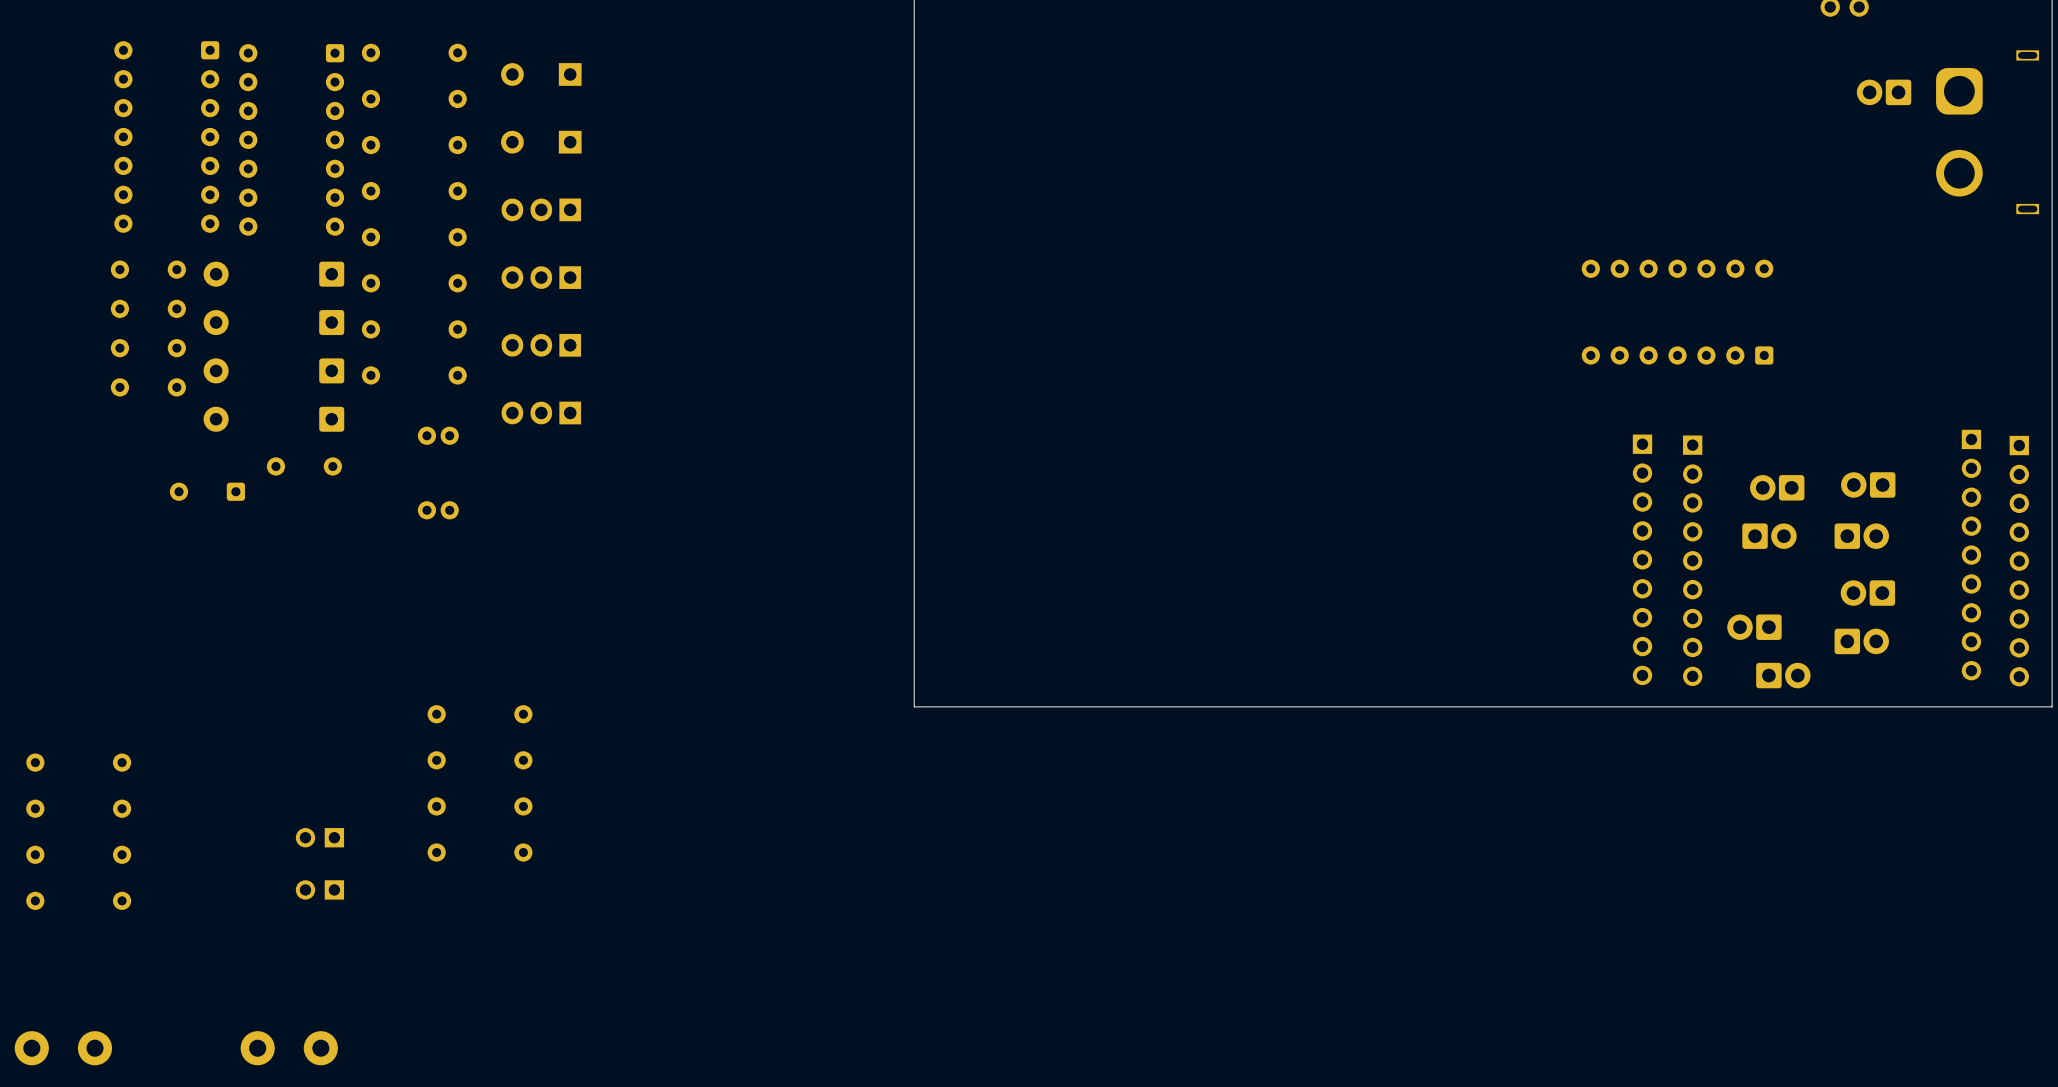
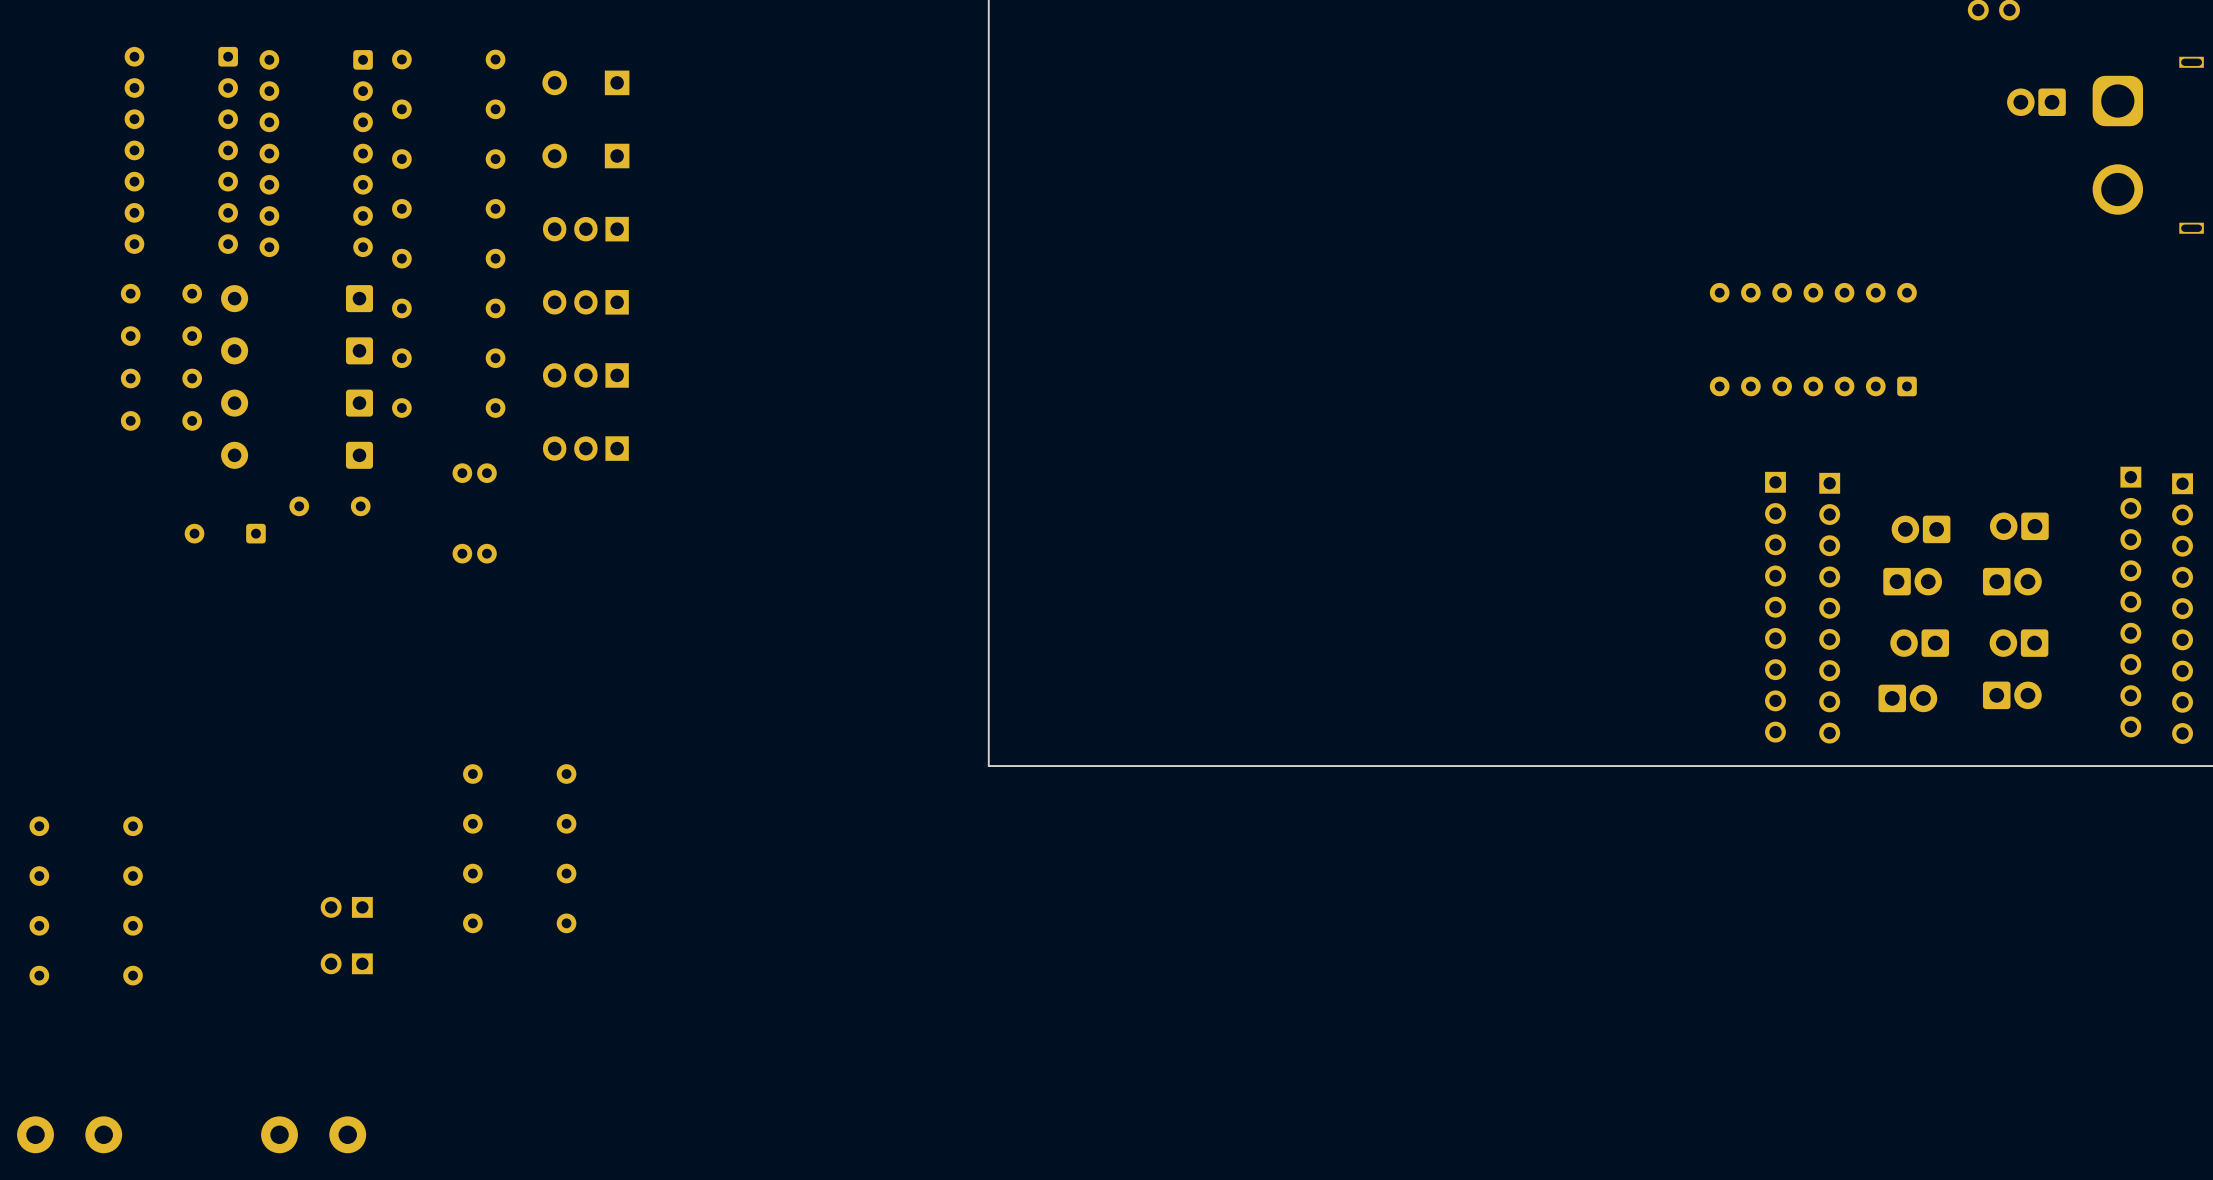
part: none -> (1919, 643)
part: (1754, 627) -> none
part: none -> (1907, 698)
part: (1783, 675) -> none

